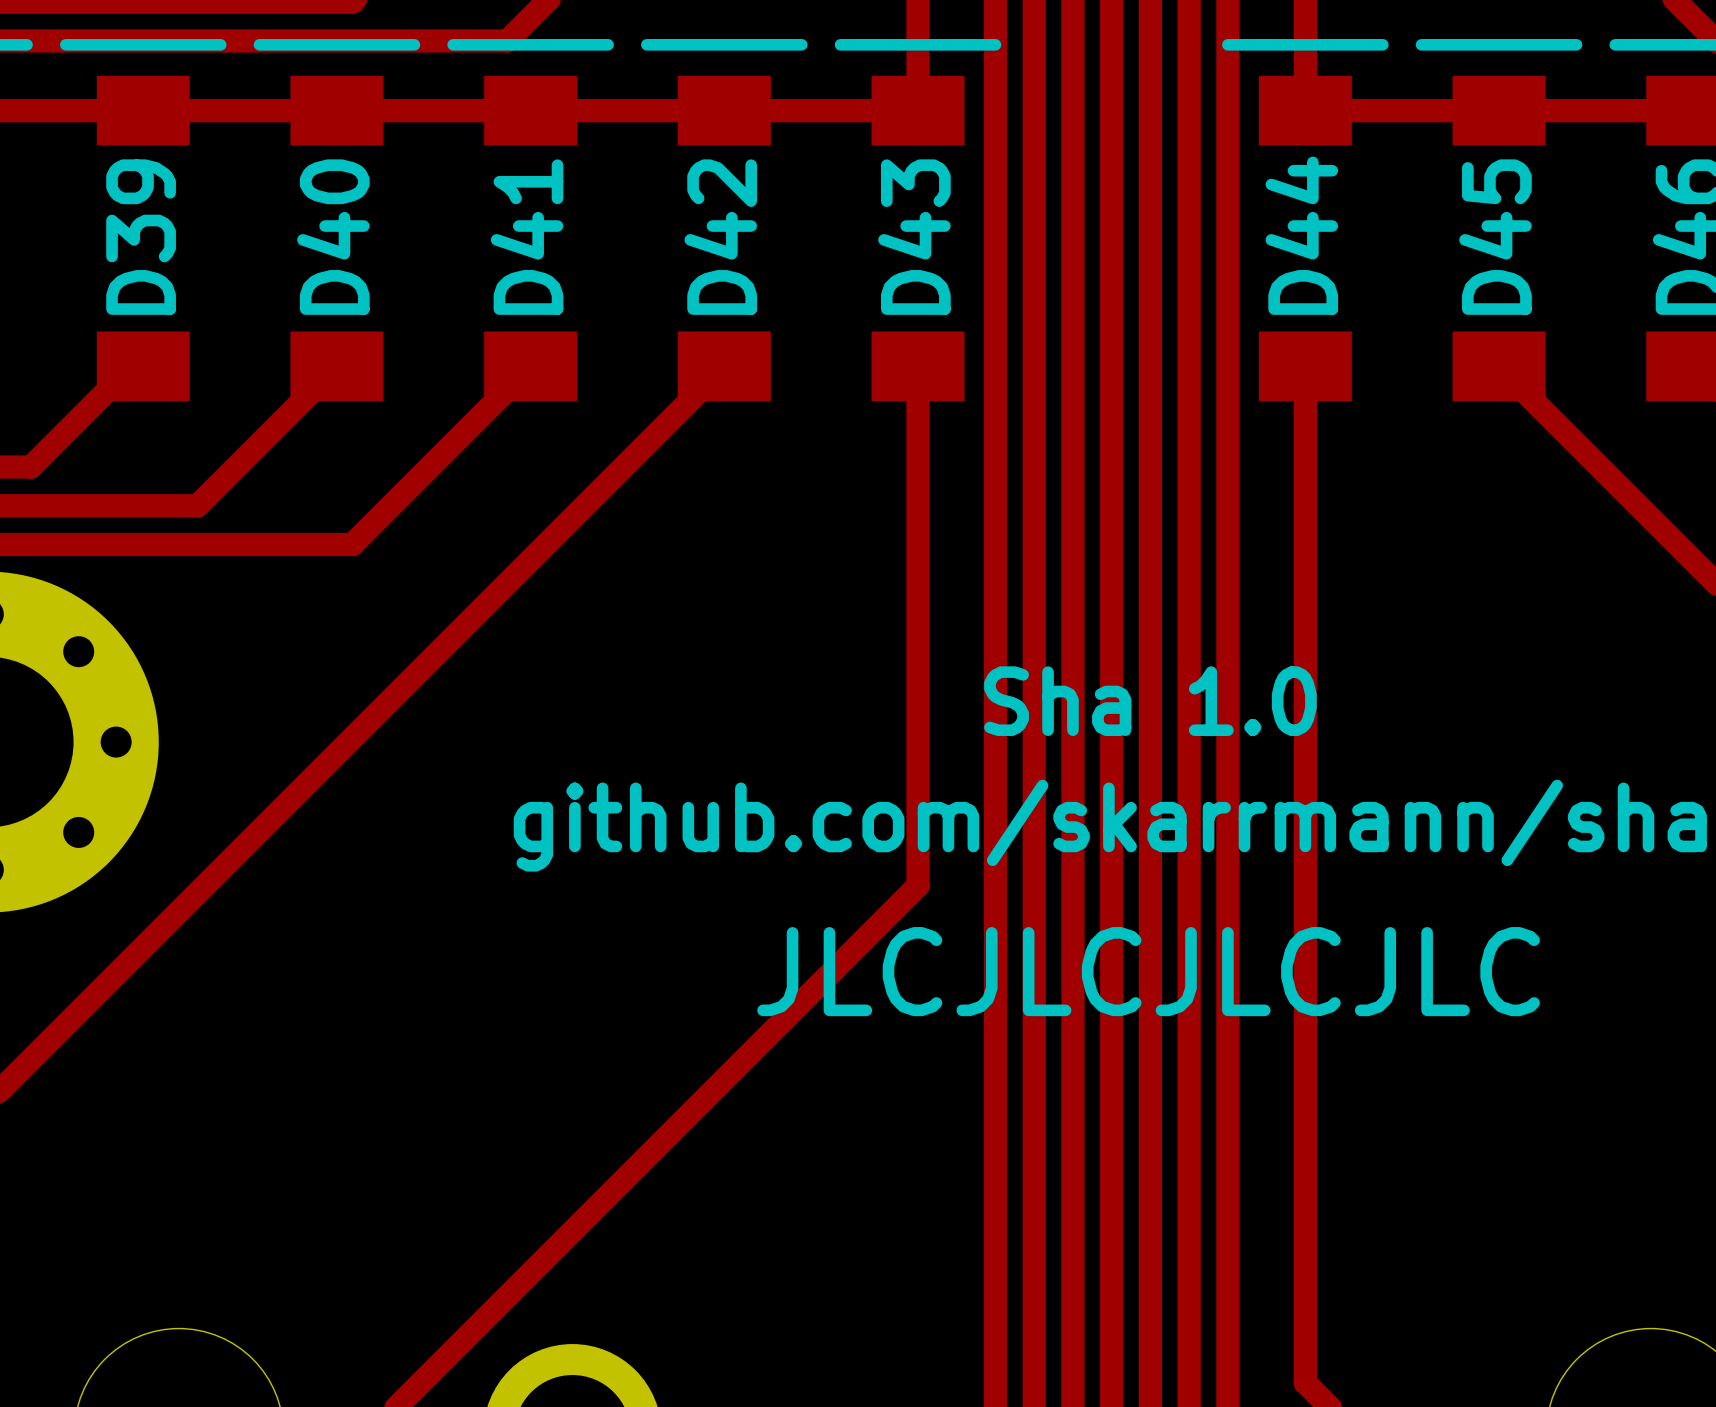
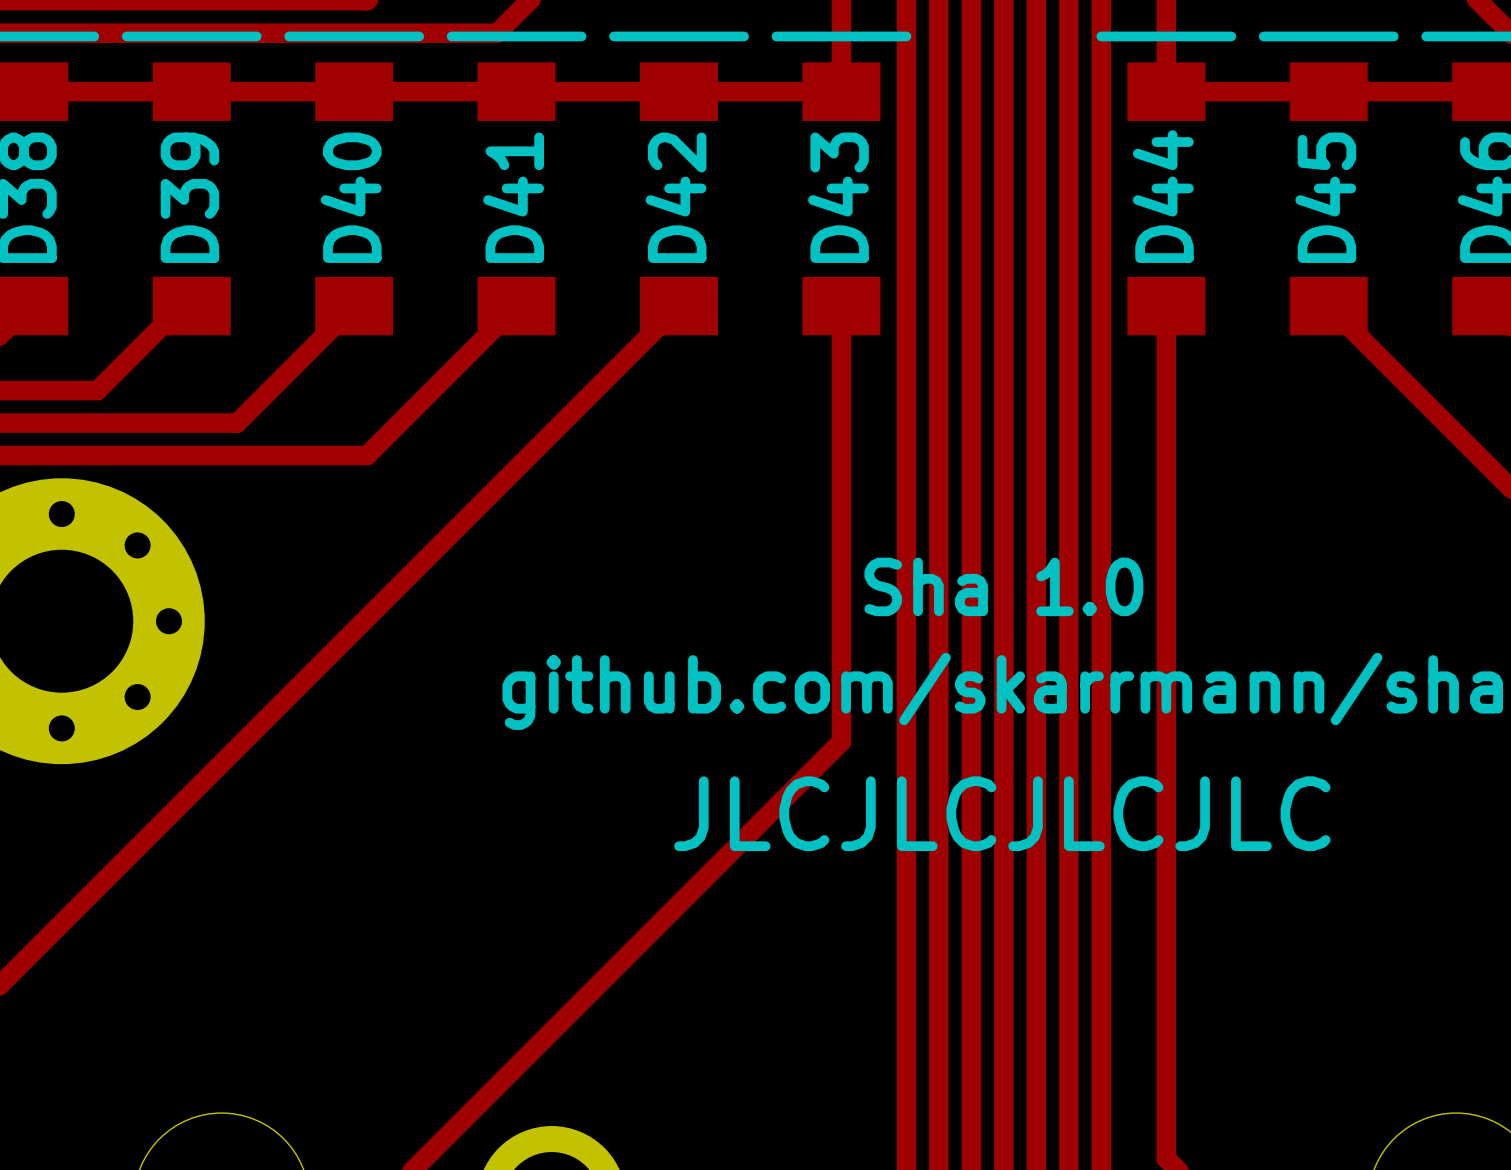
text position: Sha 1.0 (1150, 701) -> Sha 1.0 (1003, 586)
text position: JLCJLCJLCJLC (1148, 971) -> JLCJLCJLCJLC (1002, 813)

